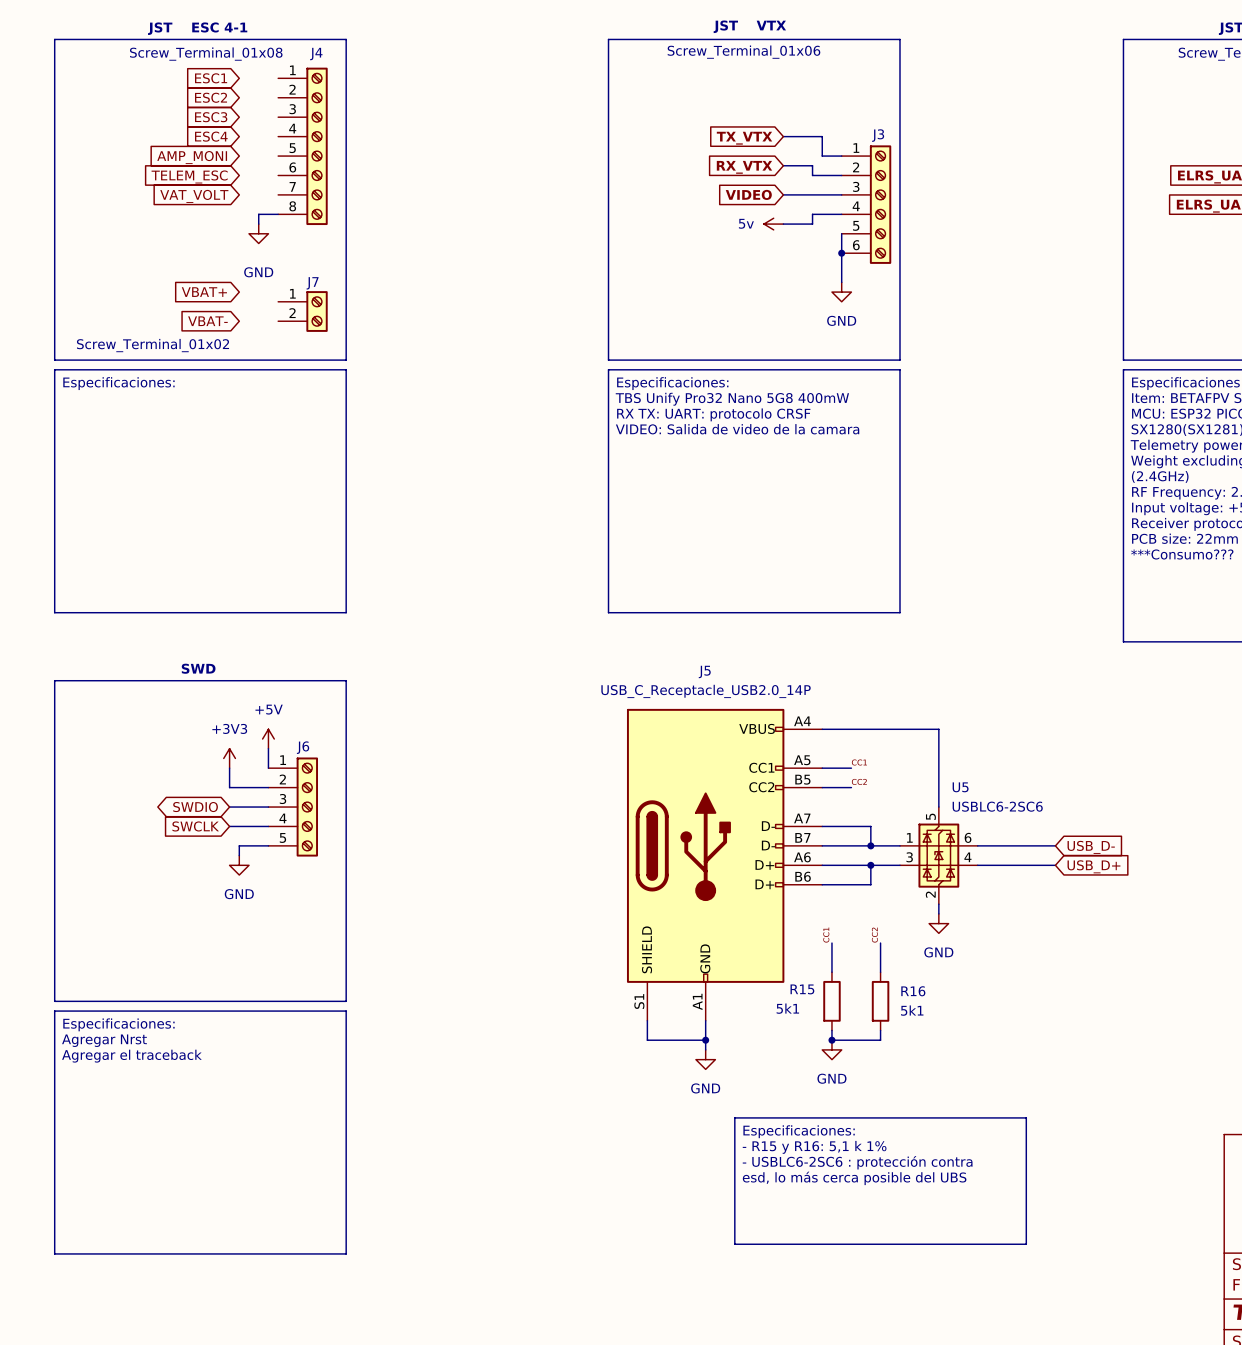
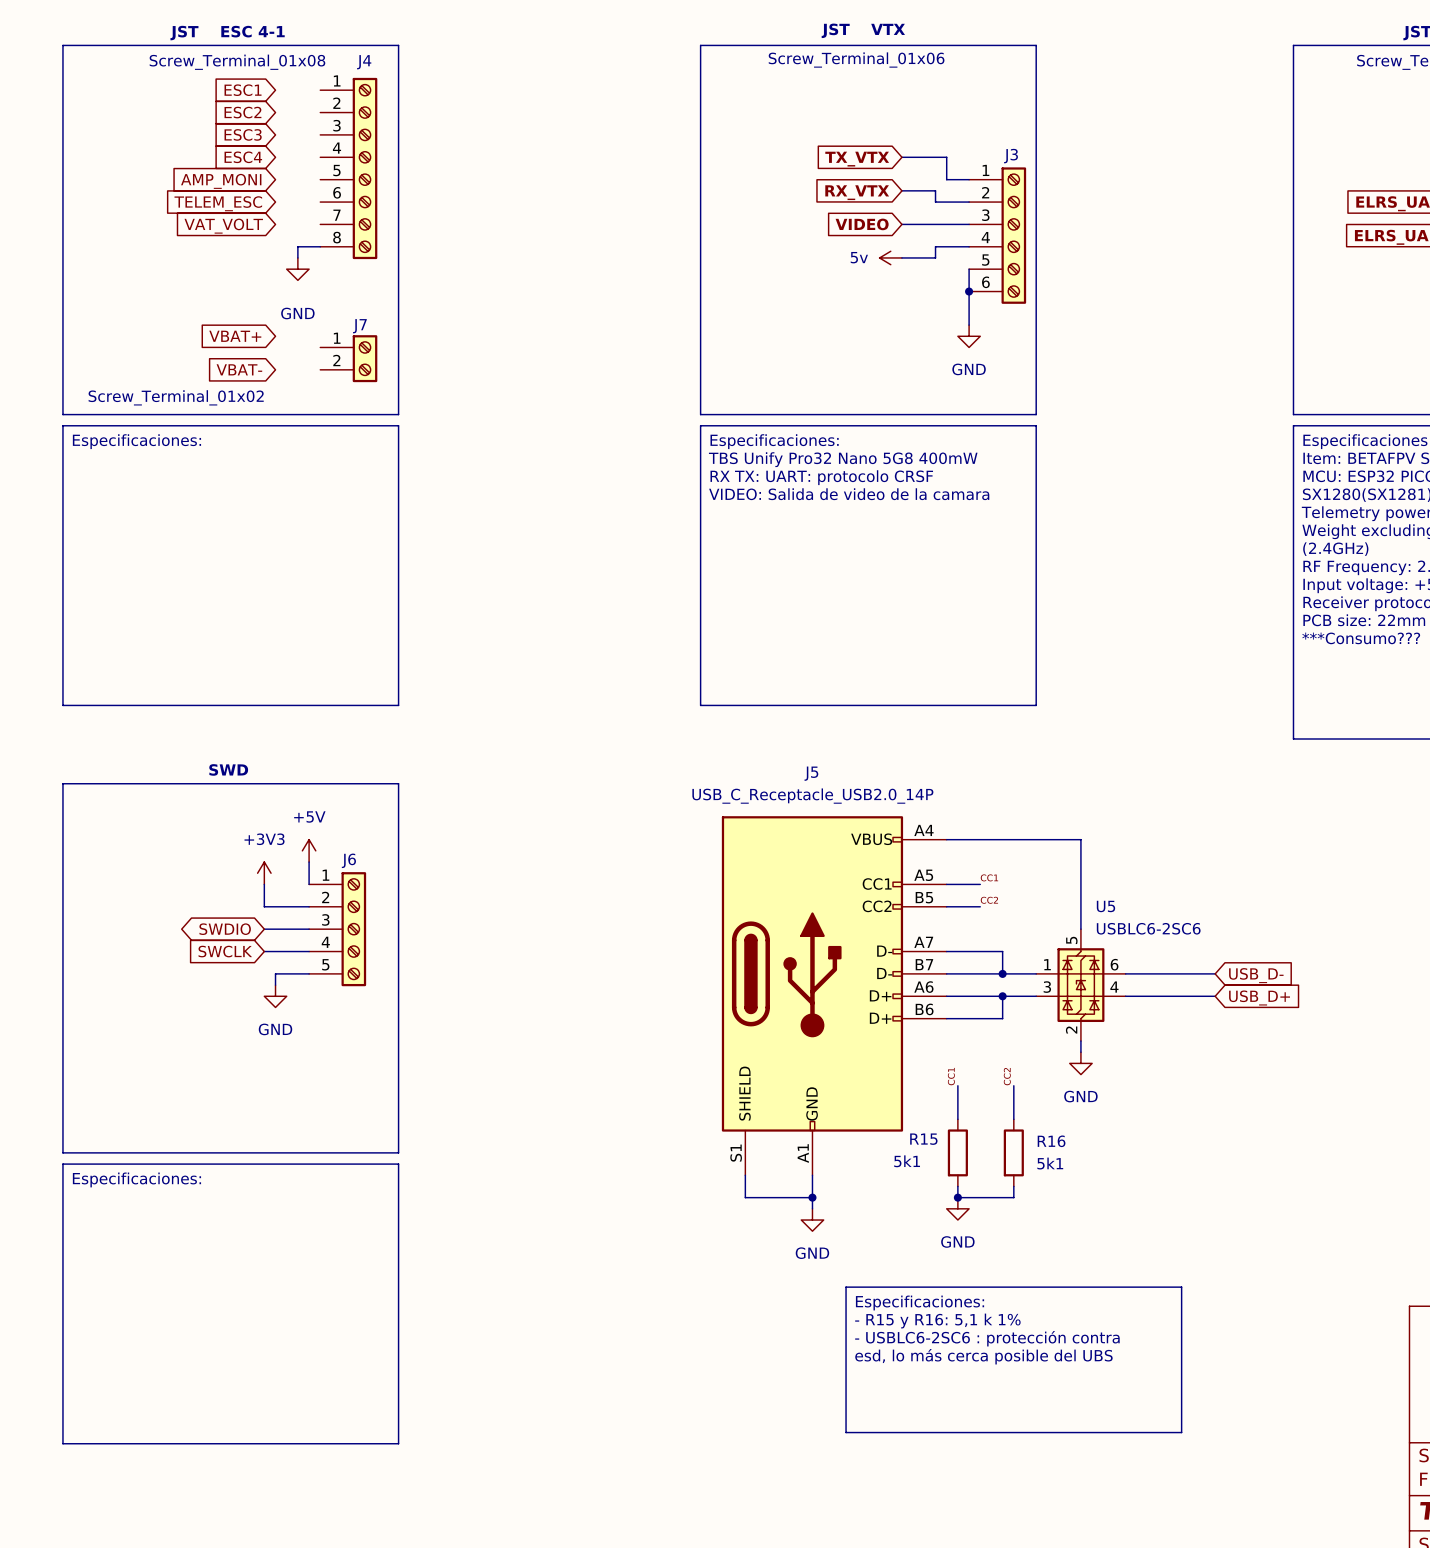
text: Agregar Nrst (104, 1040) -> none
text: Agregar el traceback (131, 1056) -> none

